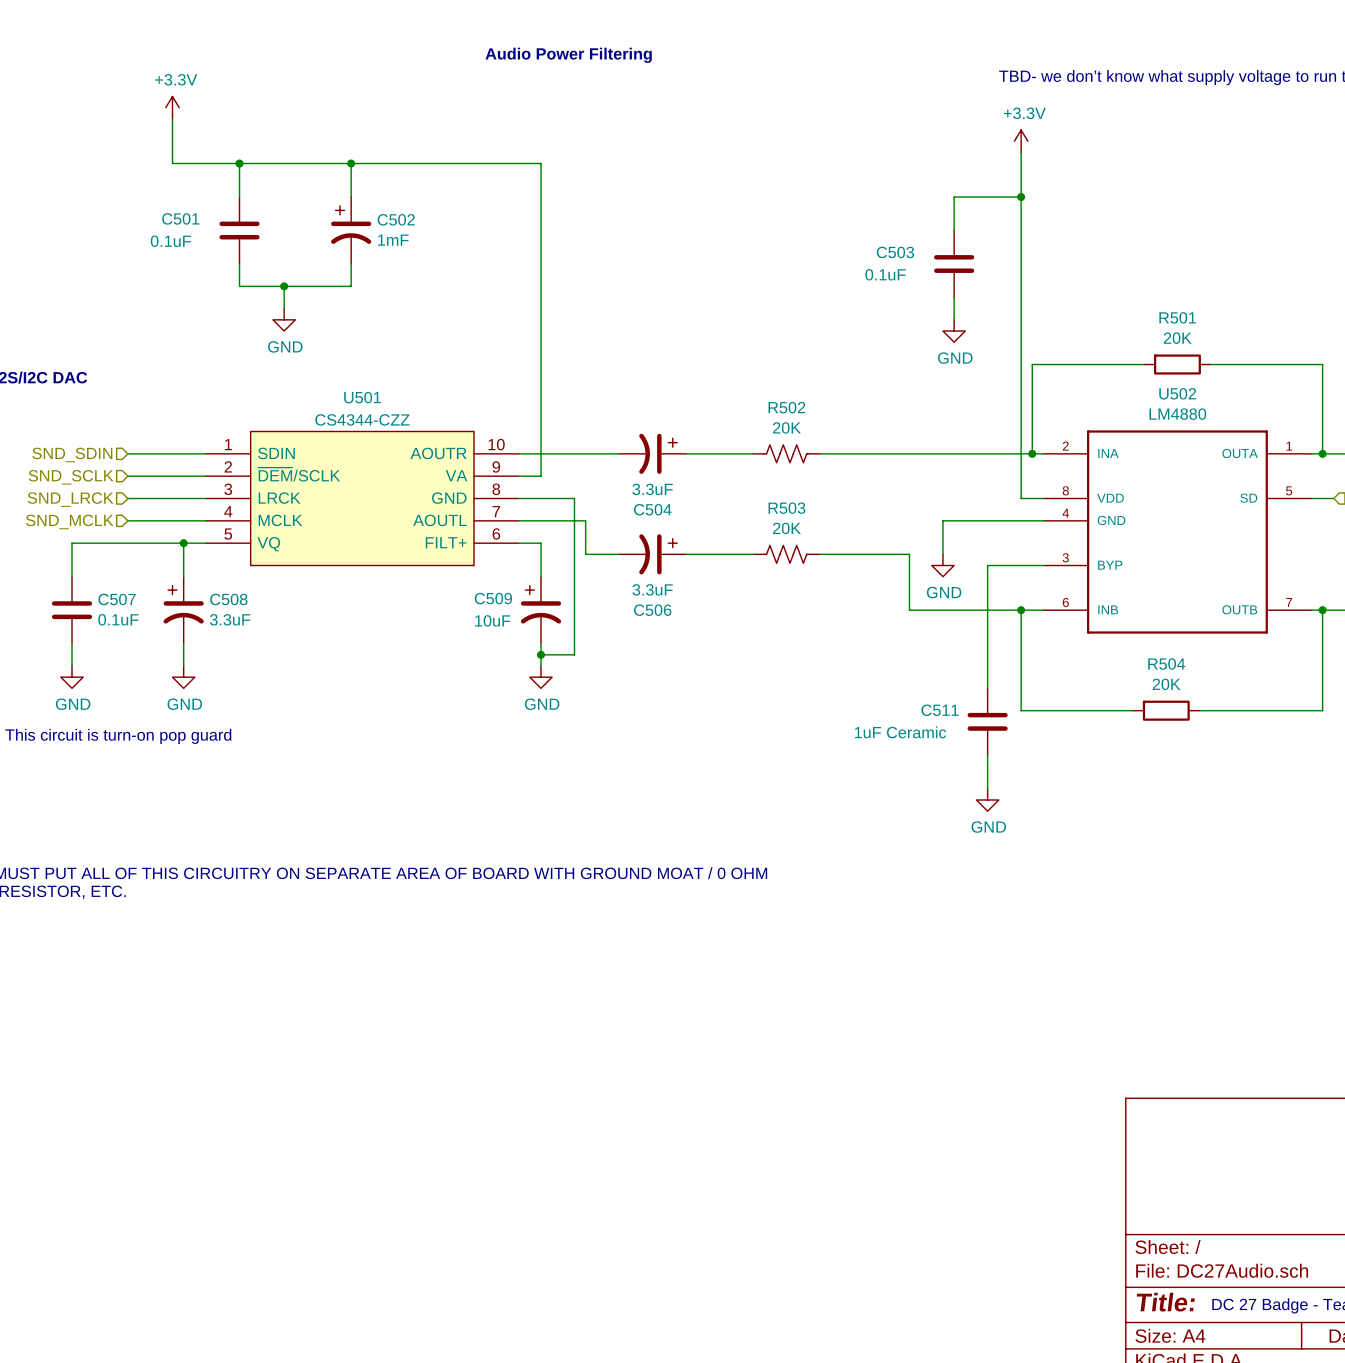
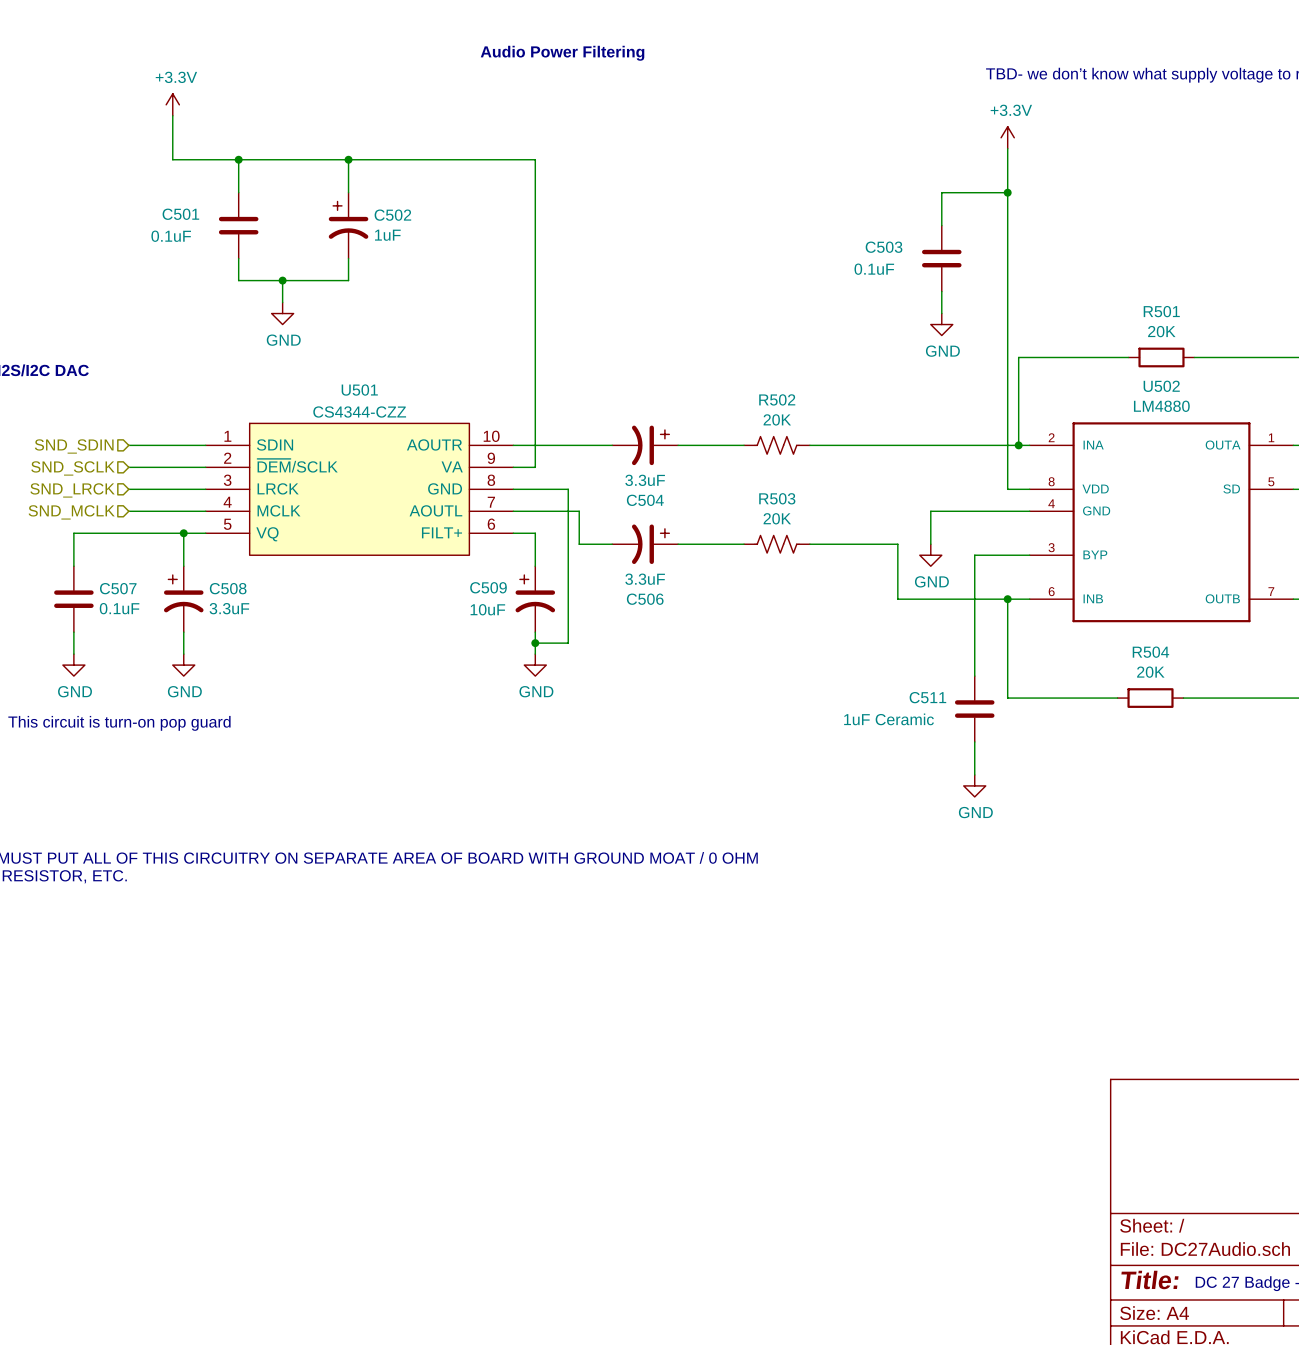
C502 value: 1mF (393, 240) -> 1uF (387, 235)

